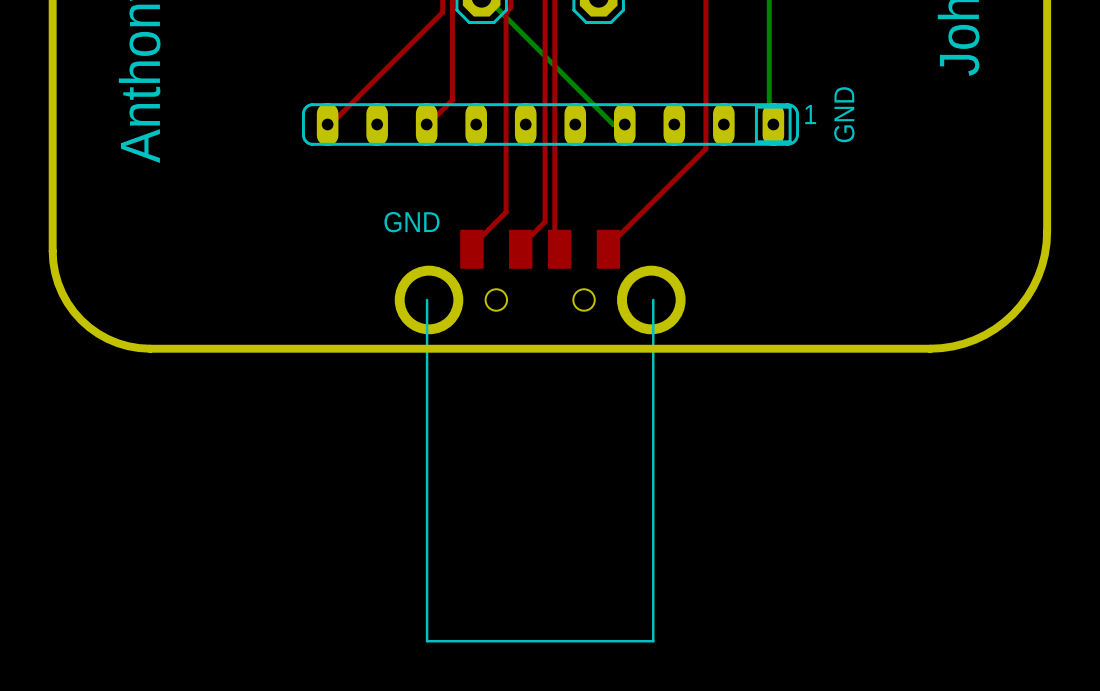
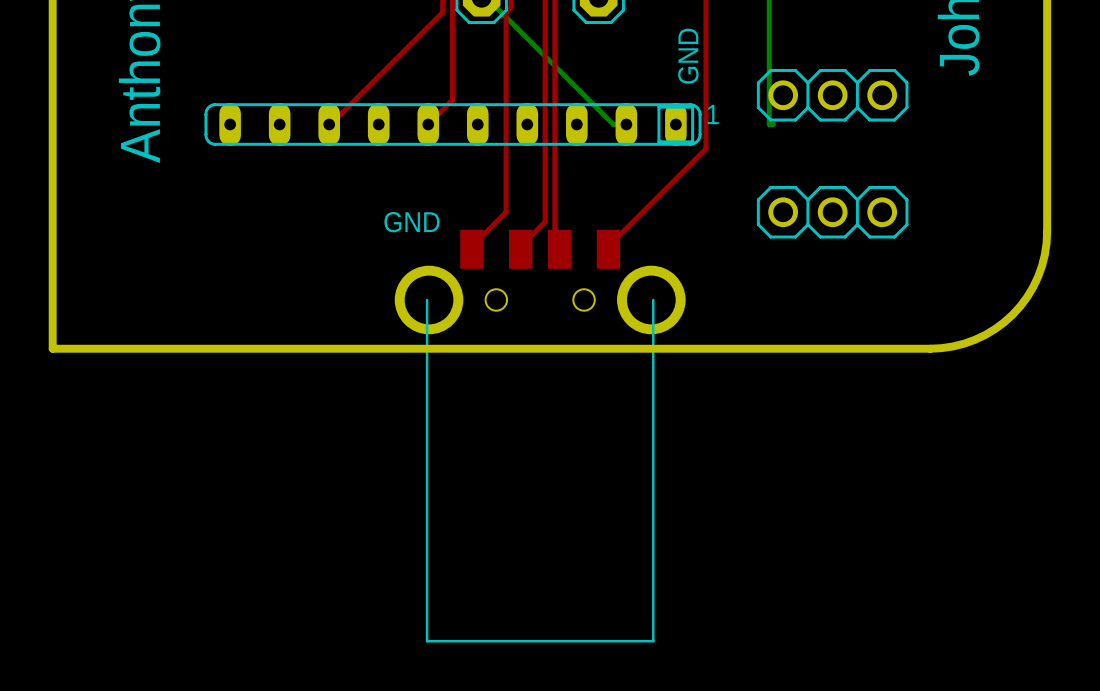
part: none -> (832, 95)
text position: GND (844, 114) -> GND (688, 56)
part position: (550, 124) -> (453, 124)
part: none -> (832, 212)
board edge: (52, 251) (58, 283) (67, 303) (81, 320) (98, 333) (117, 343) (150, 348) -> (52, 251) (52, 348) (150, 348)

